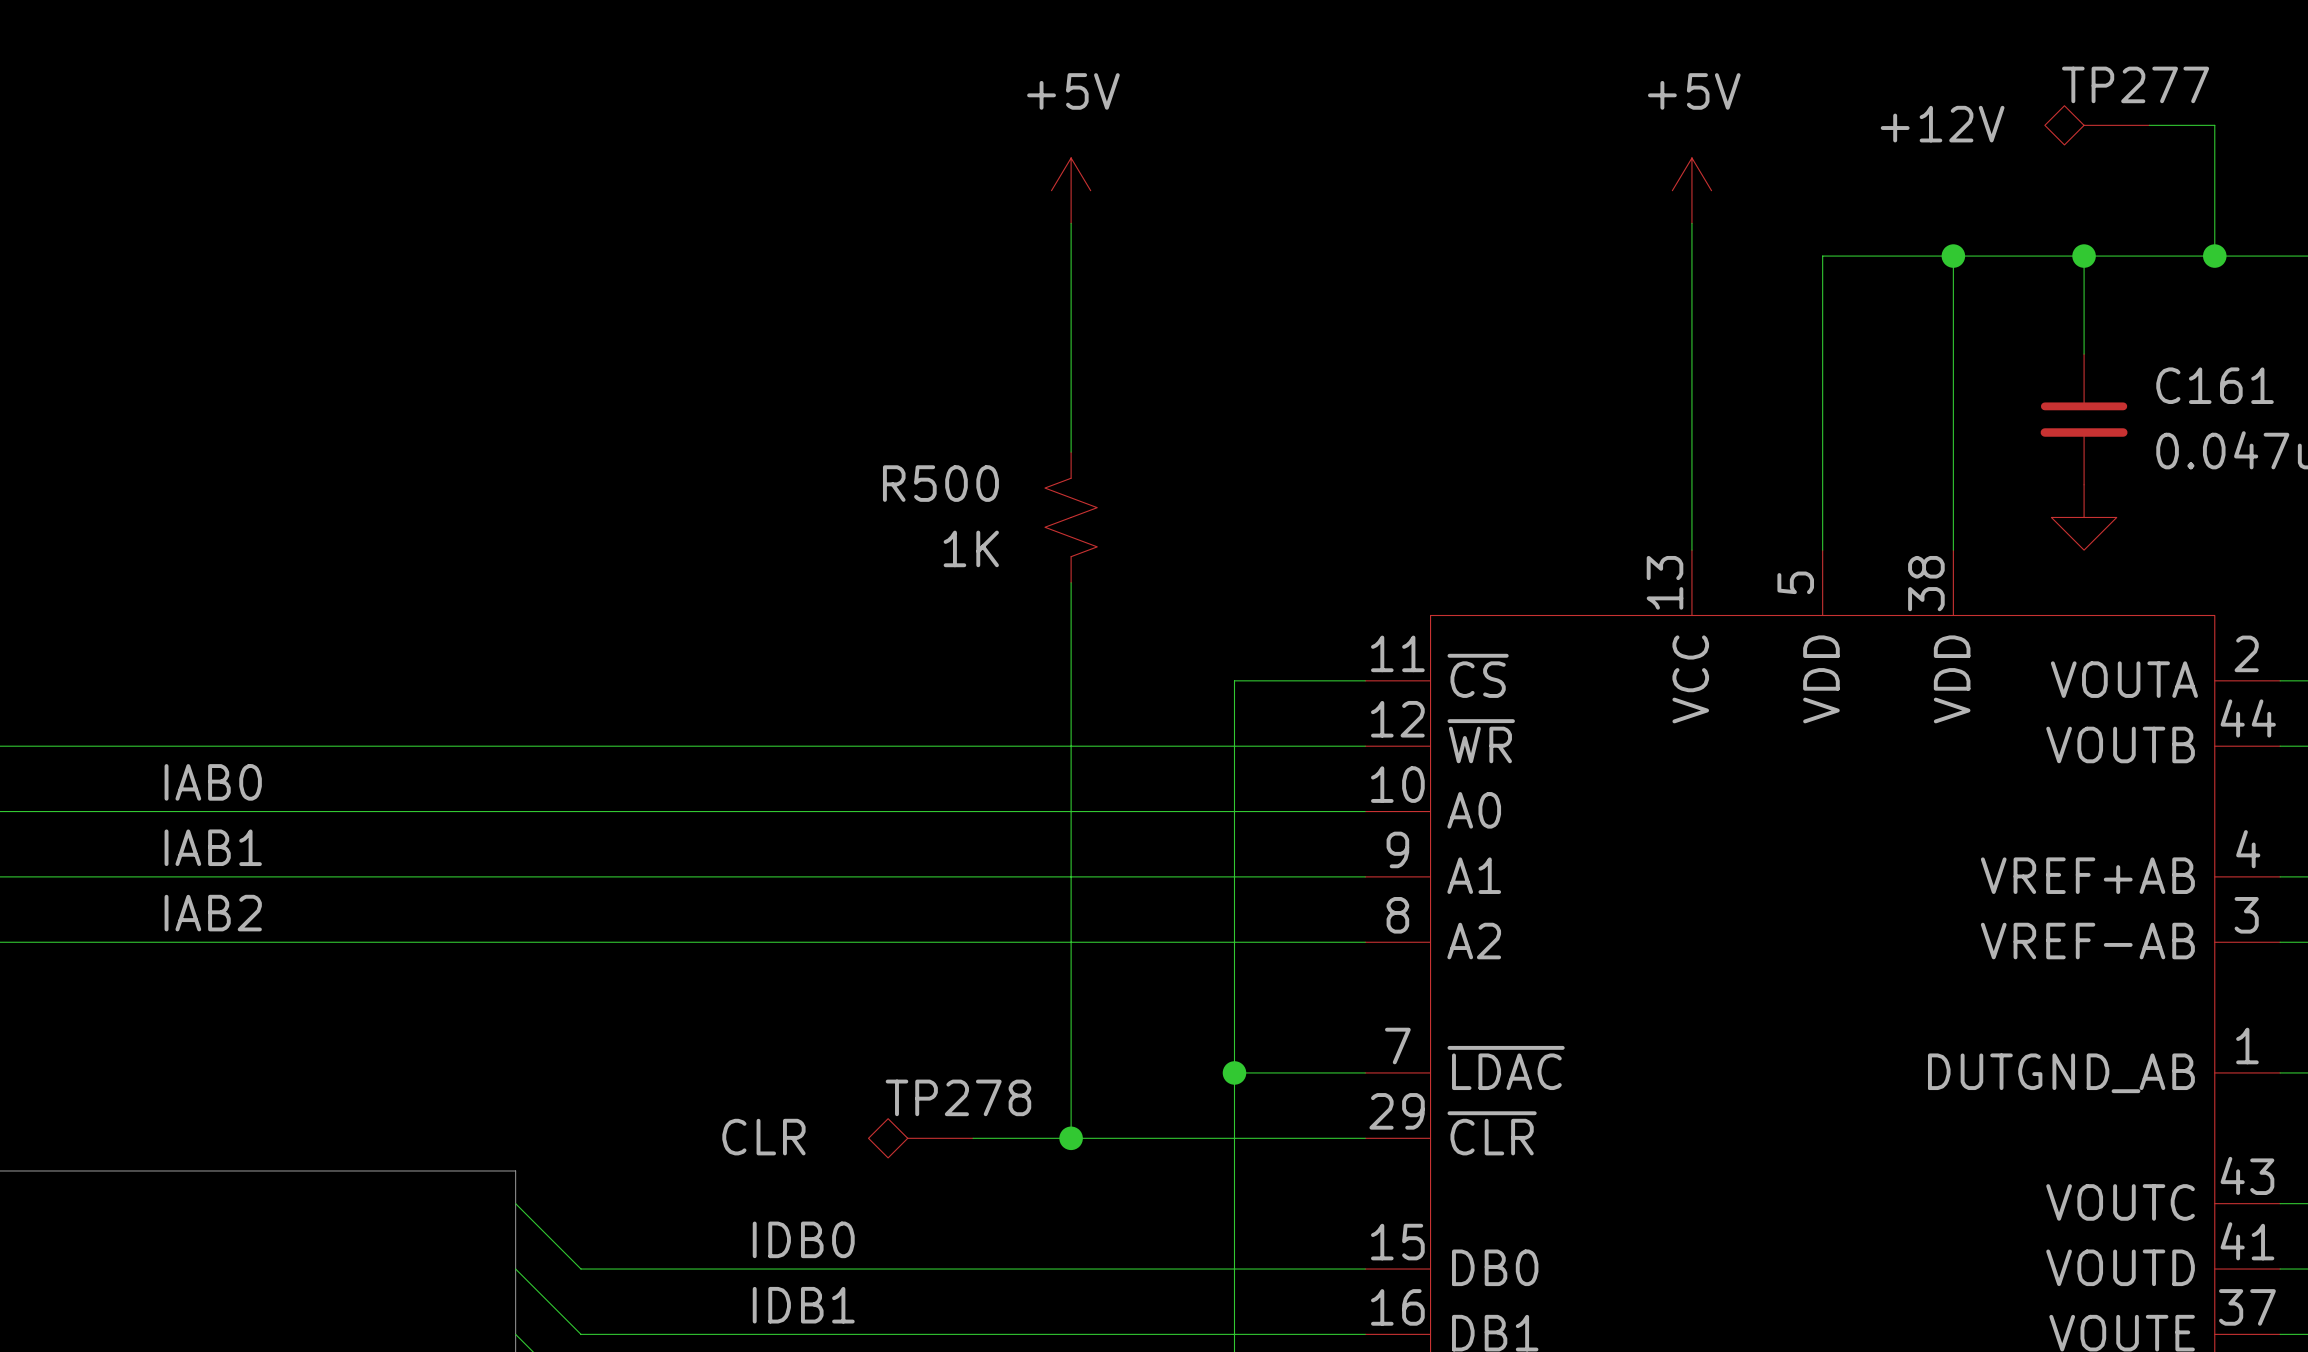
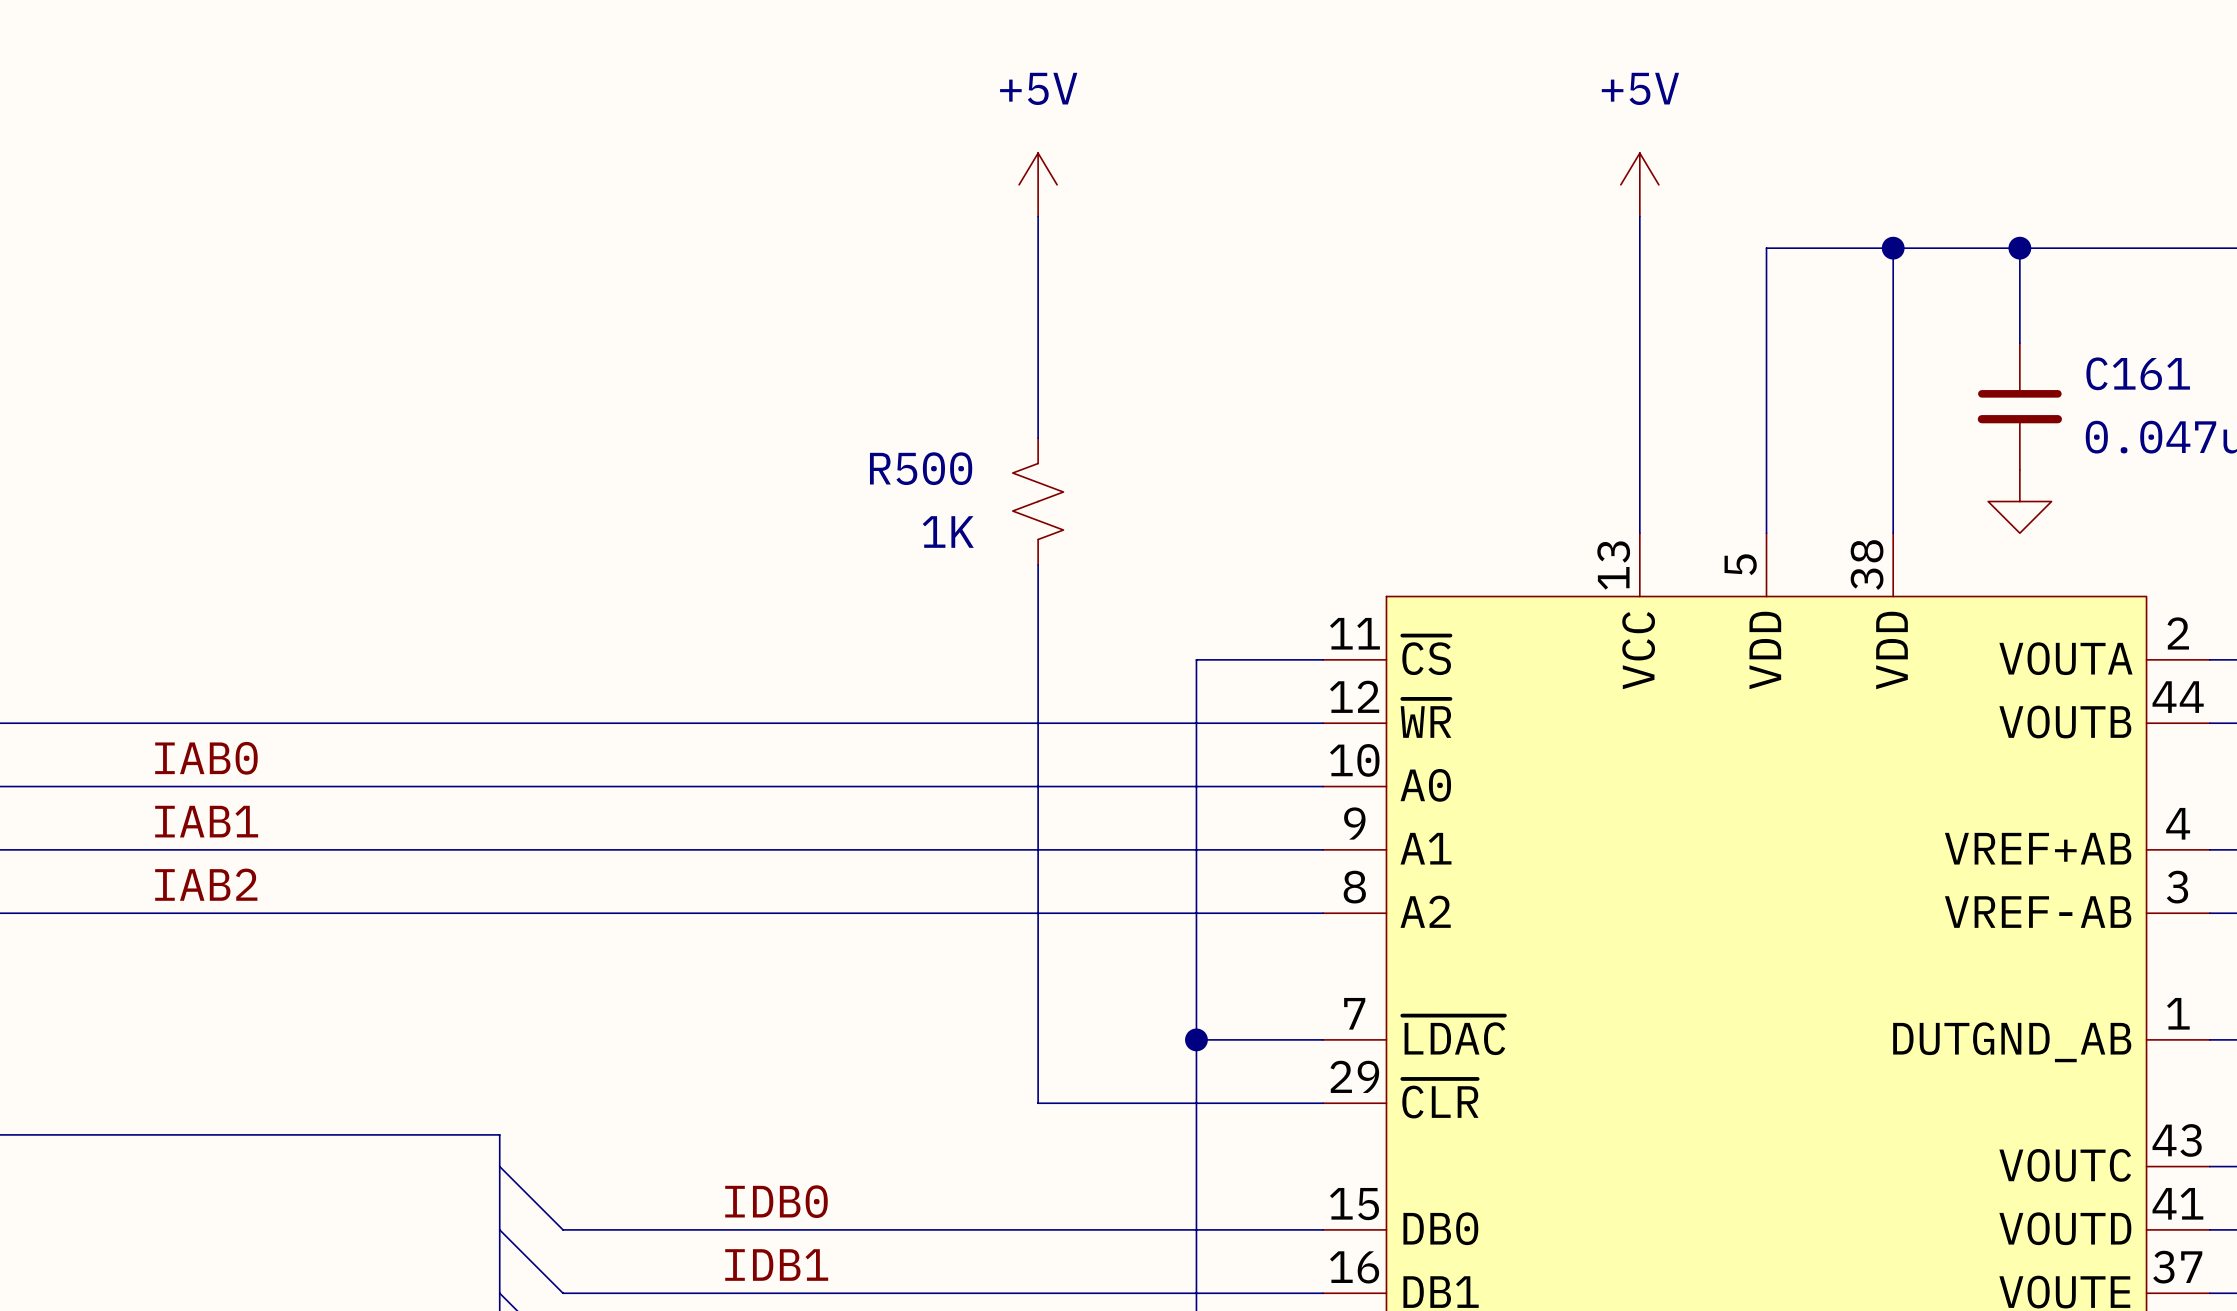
TP277: +12V (2097, 125) -> none
wire: (2149, 125) (2214, 125) (2214, 256) -> none
junction: (2214, 256) -> none
TP278: CLR (920, 1138) -> none
wire: (973, 1138) (1071, 1138) -> none
junction: (1071, 1138) -> none

